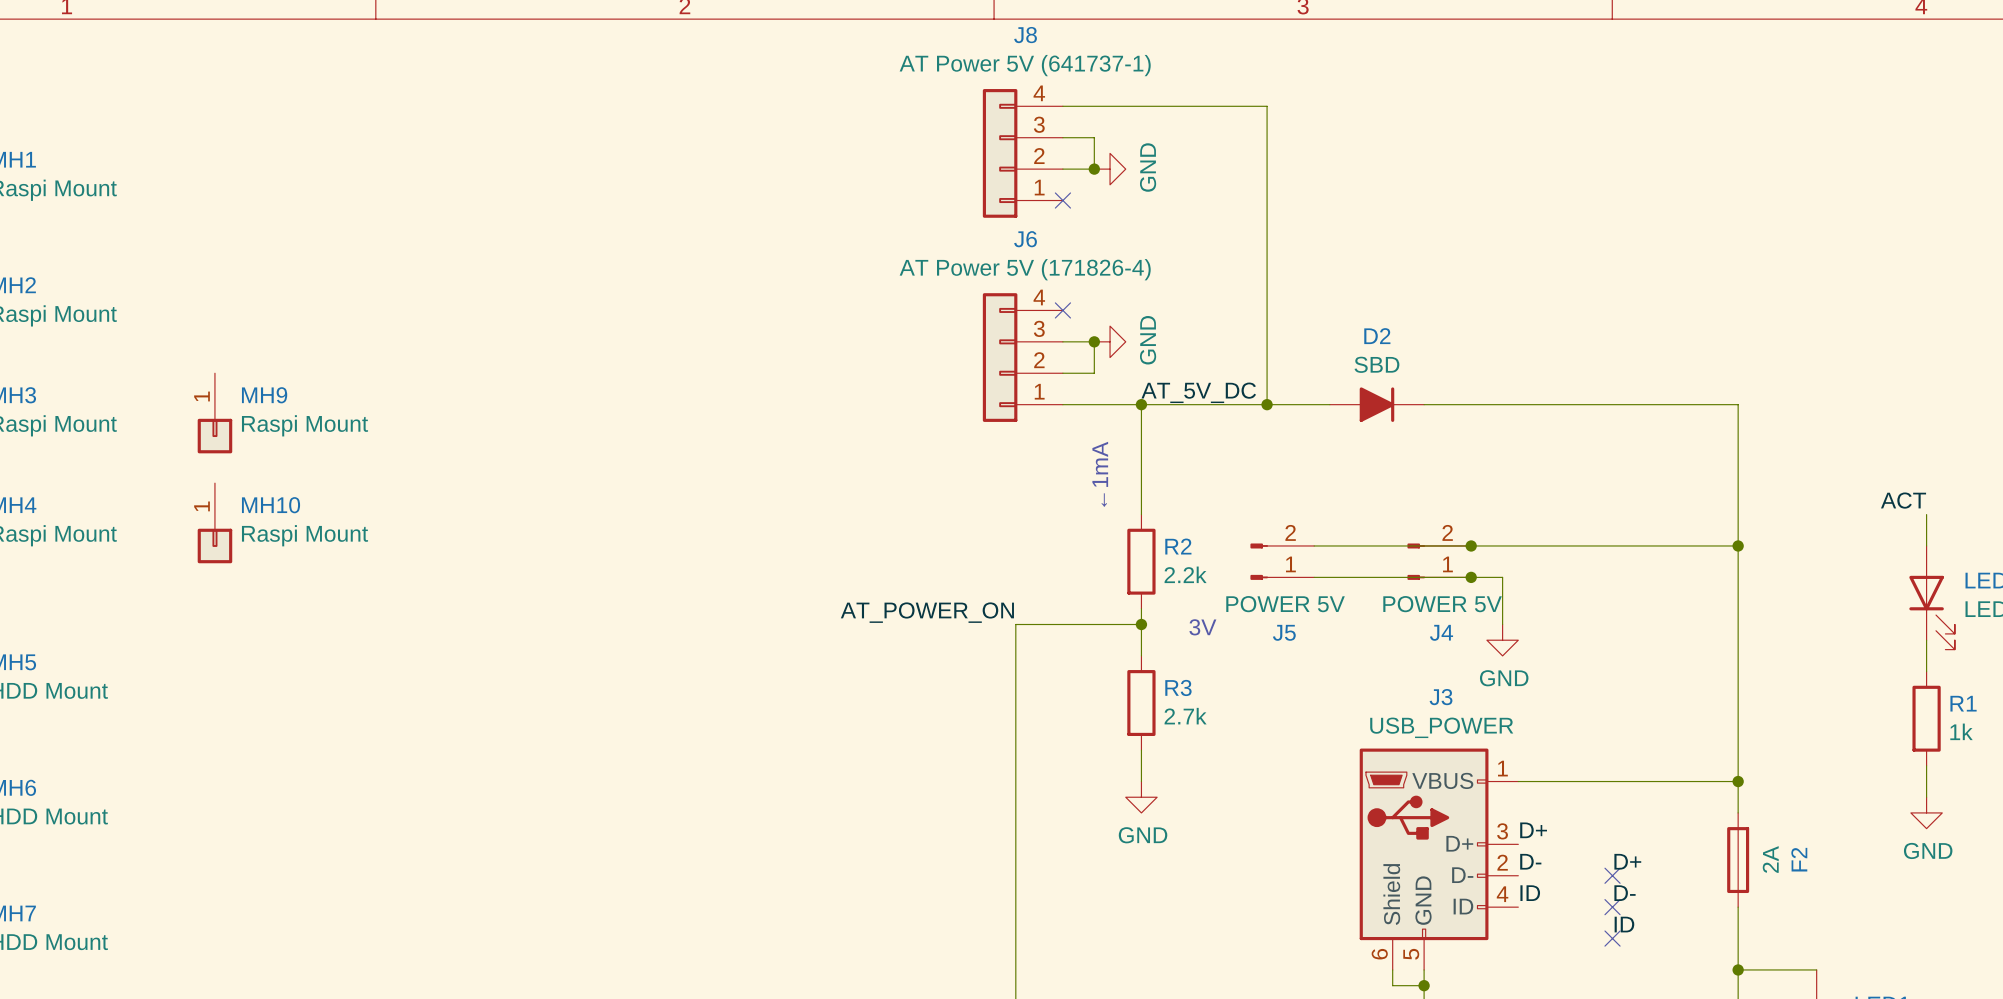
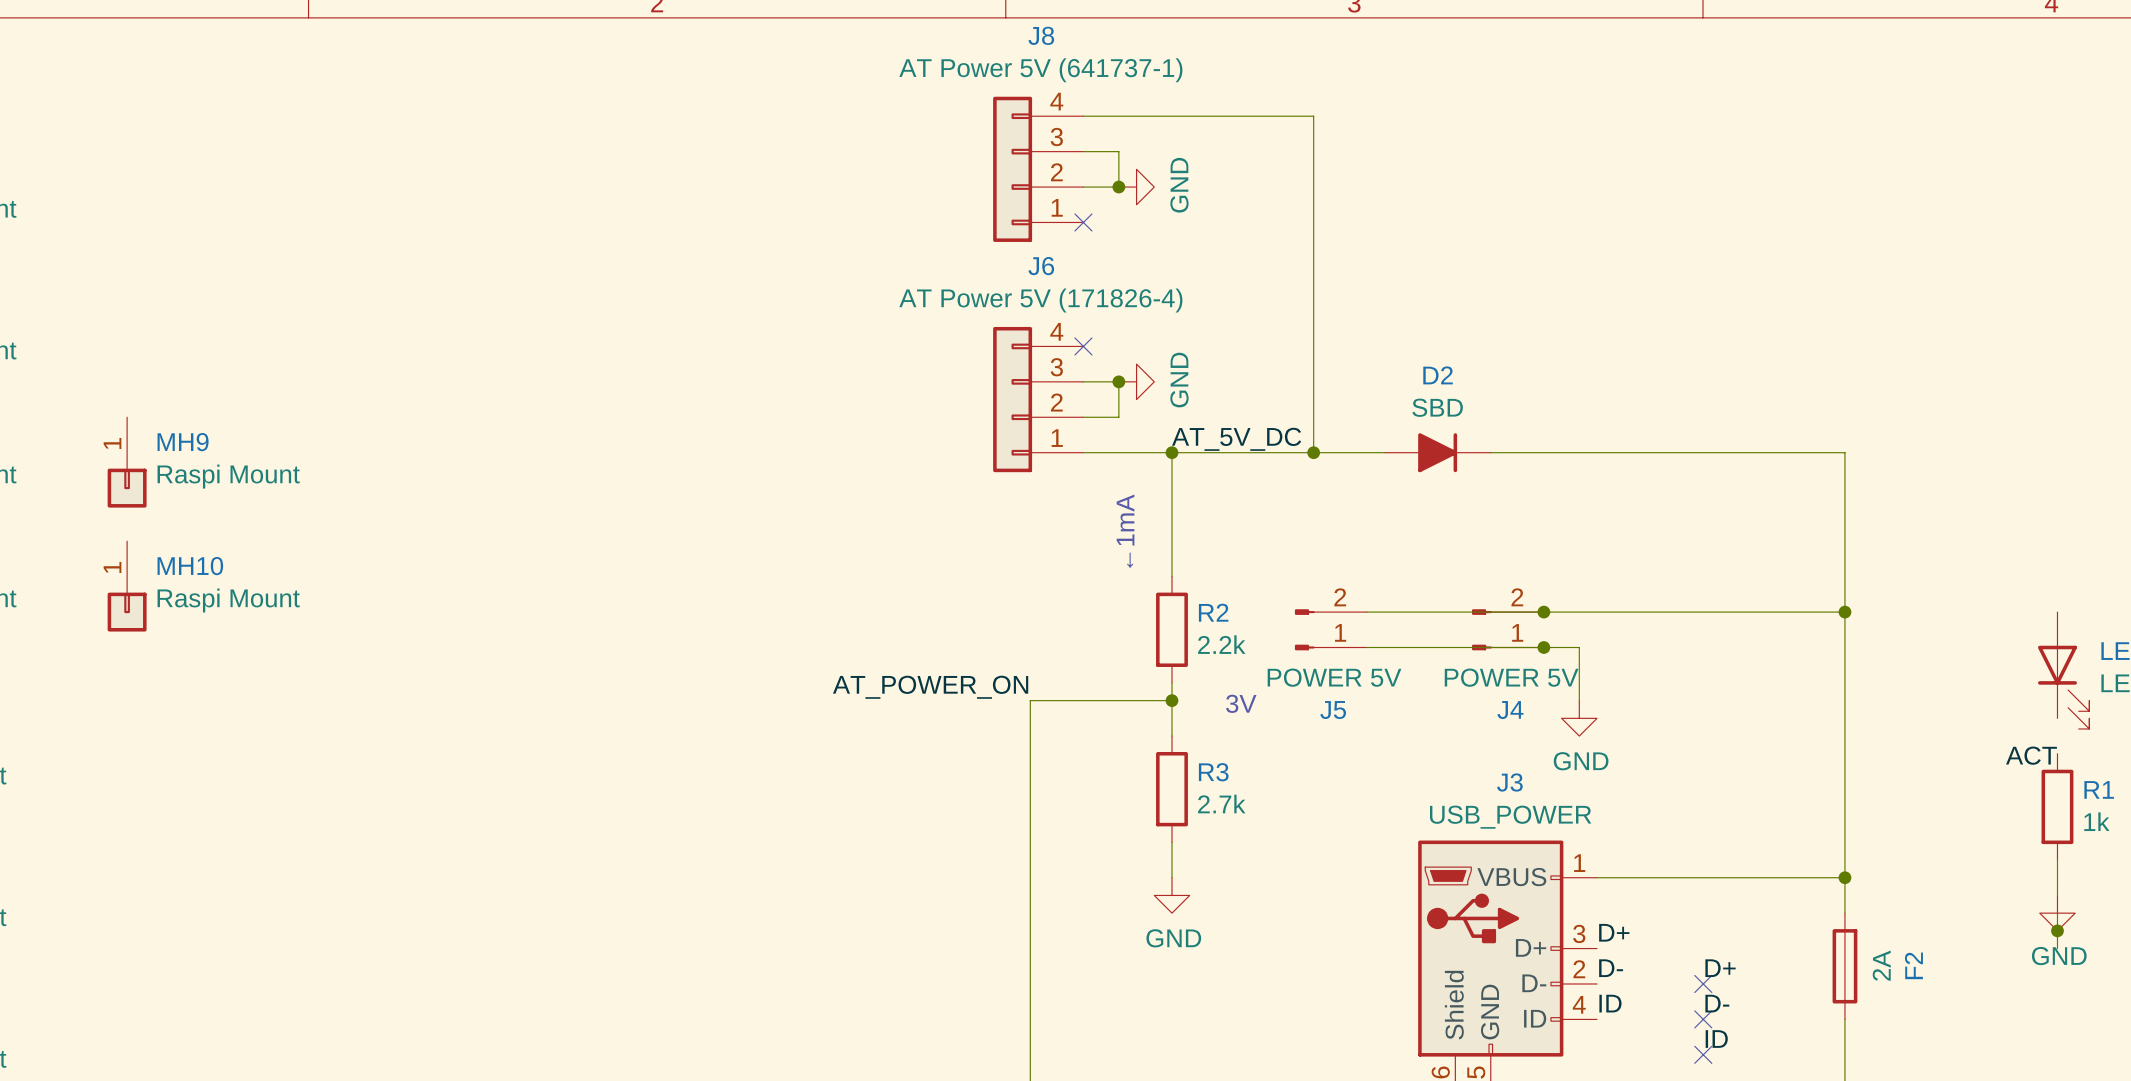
label position: ACT (1903, 500) -> ACT (2031, 755)
wire: (1926, 514) (1926, 545) -> none
wire: (1926, 640) (1926, 671) -> (2057, 913) (2057, 948)
junction: none -> (2057, 930)

